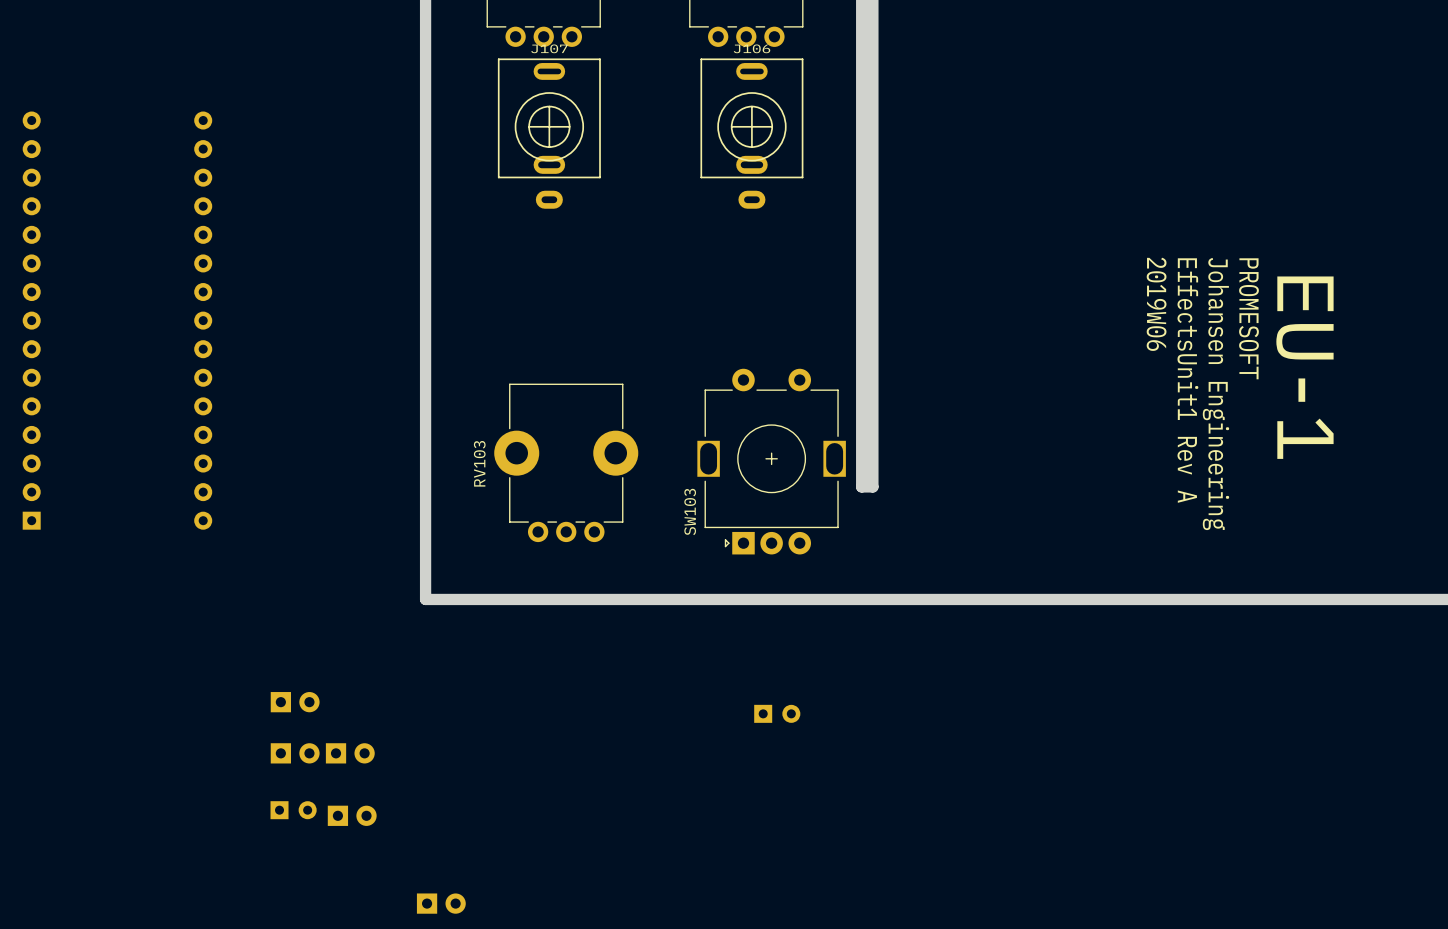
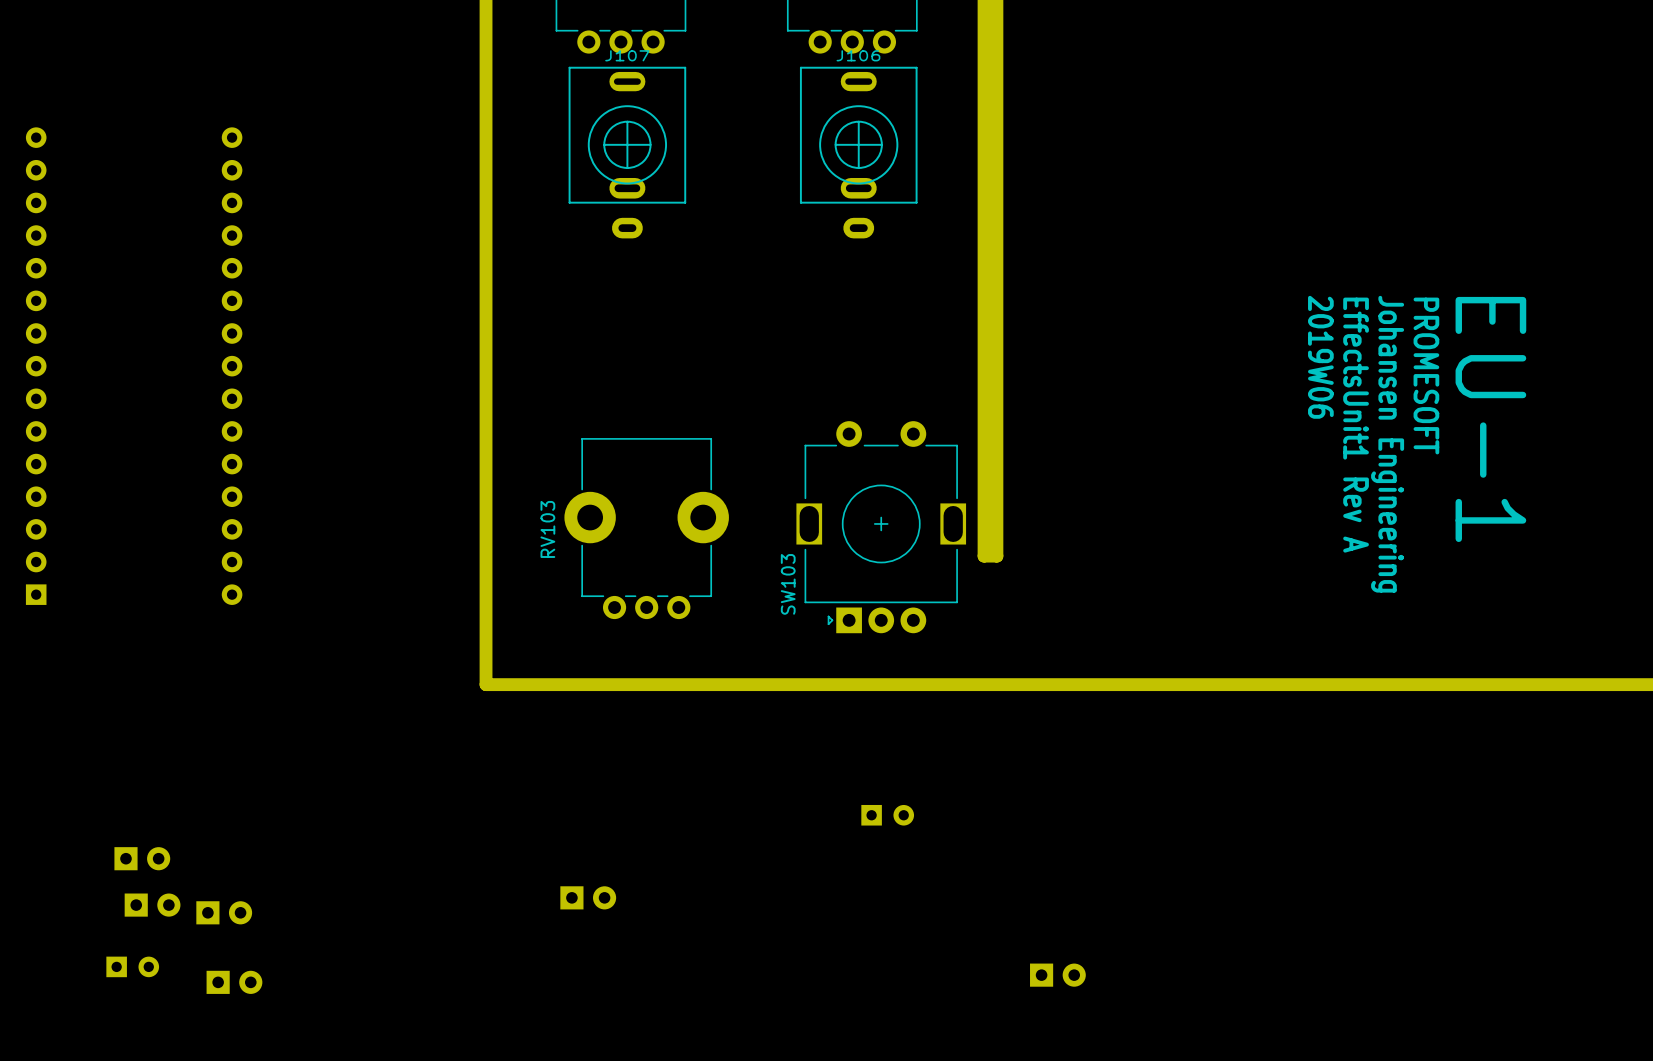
part: (295, 702) -> none
part: none -> (142, 858)
part: (295, 753) -> none
part: (350, 753) -> none
part: none -> (588, 897)
part: none -> (152, 905)
part: none -> (224, 912)
part position: (293, 810) -> (132, 966)
part: (352, 815) -> none
part: none -> (1057, 975)
part: none -> (234, 982)
part: (441, 903) -> none

